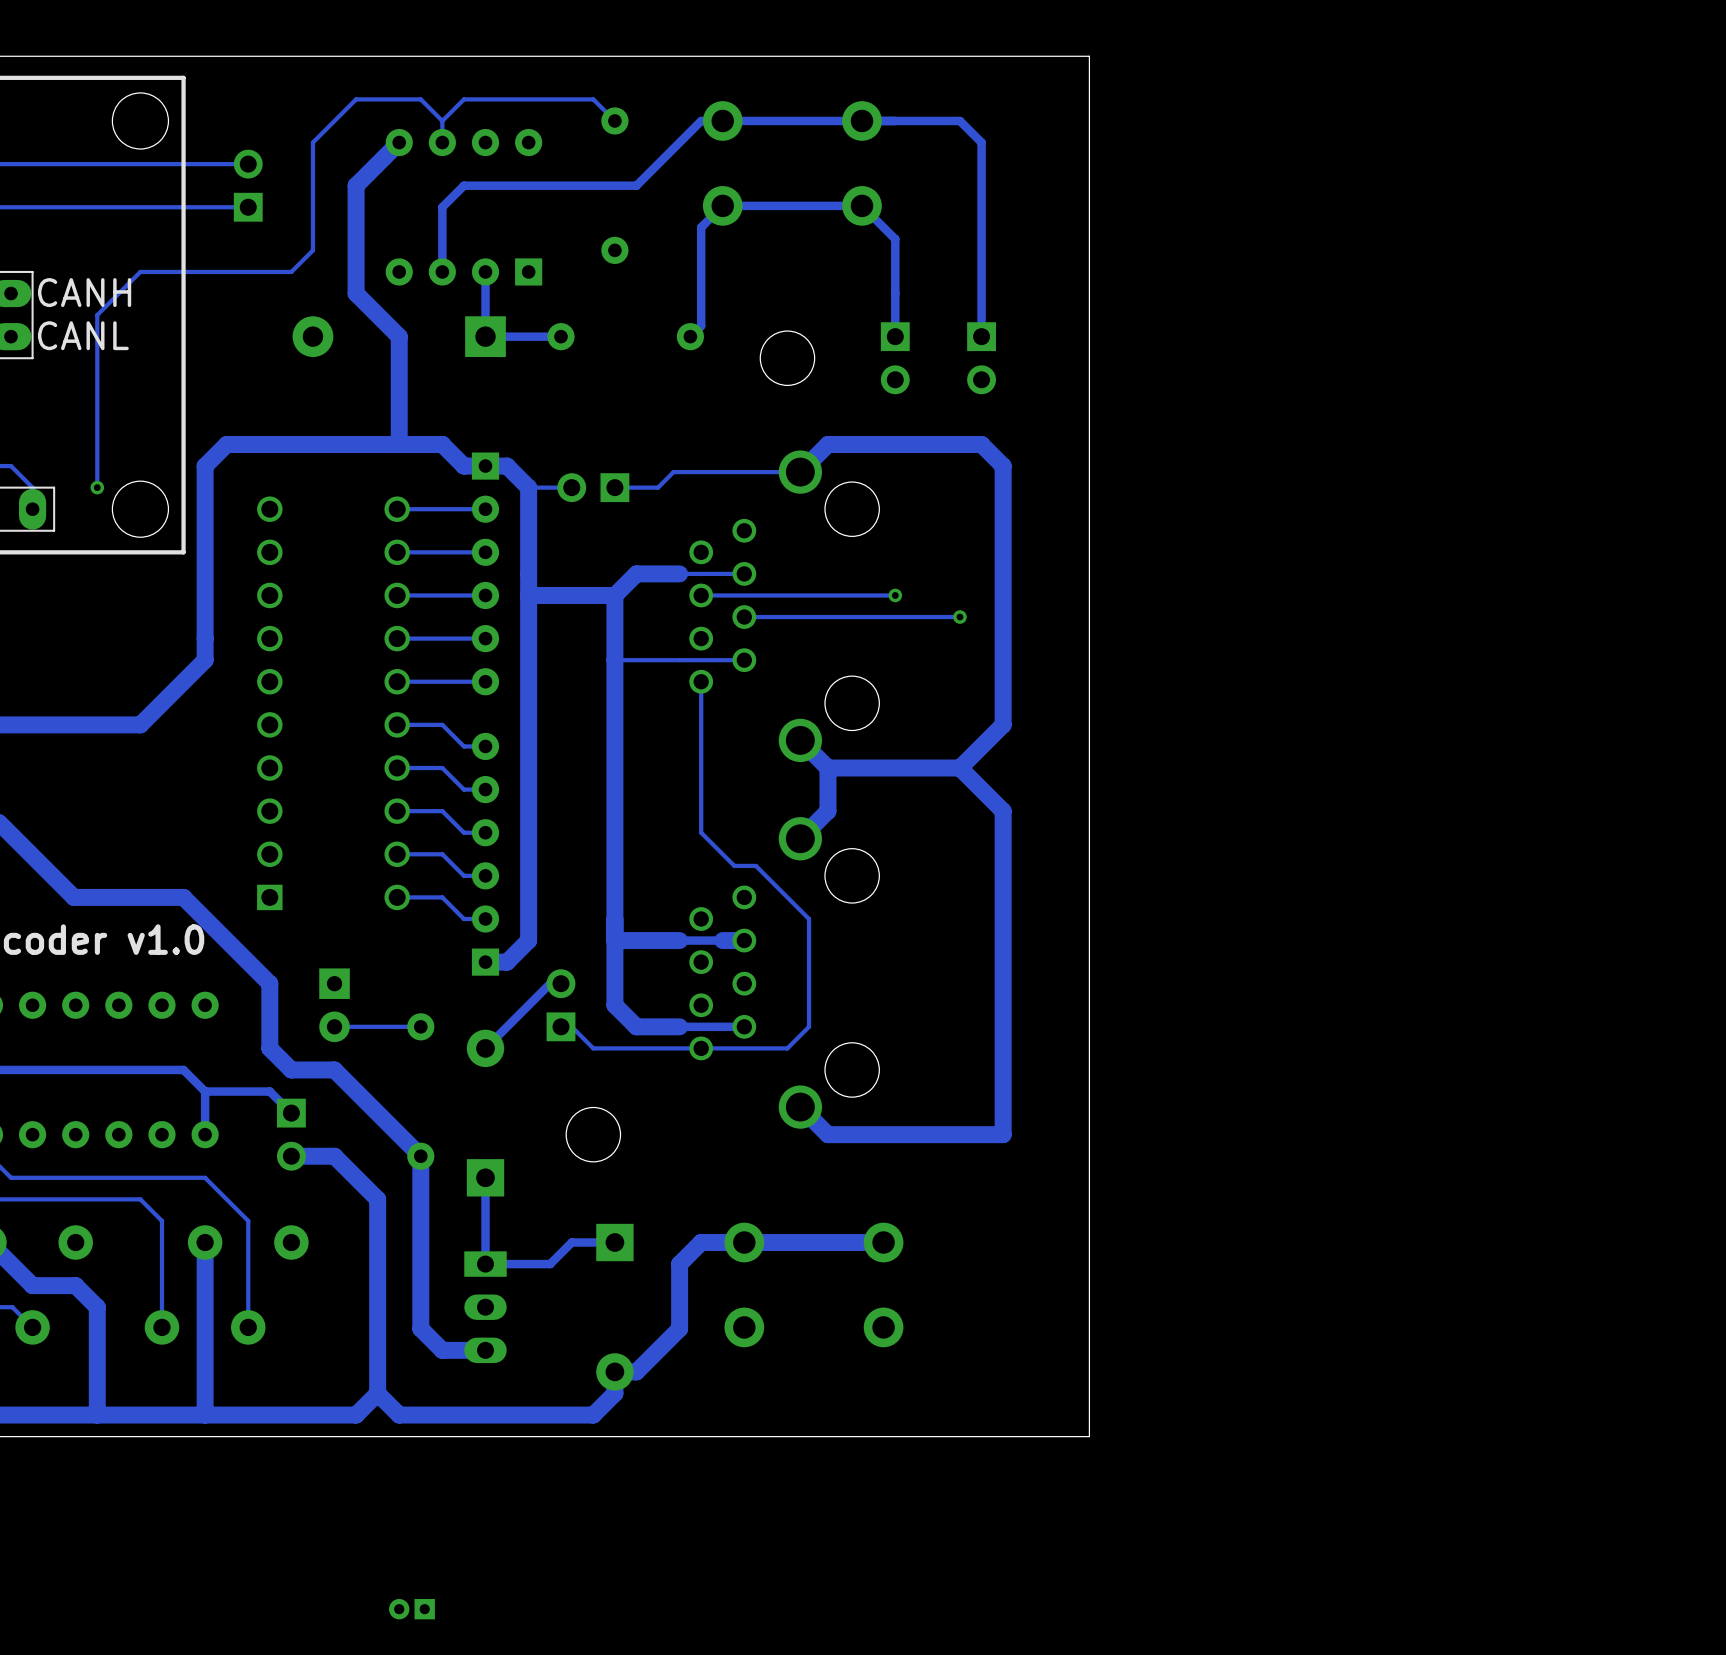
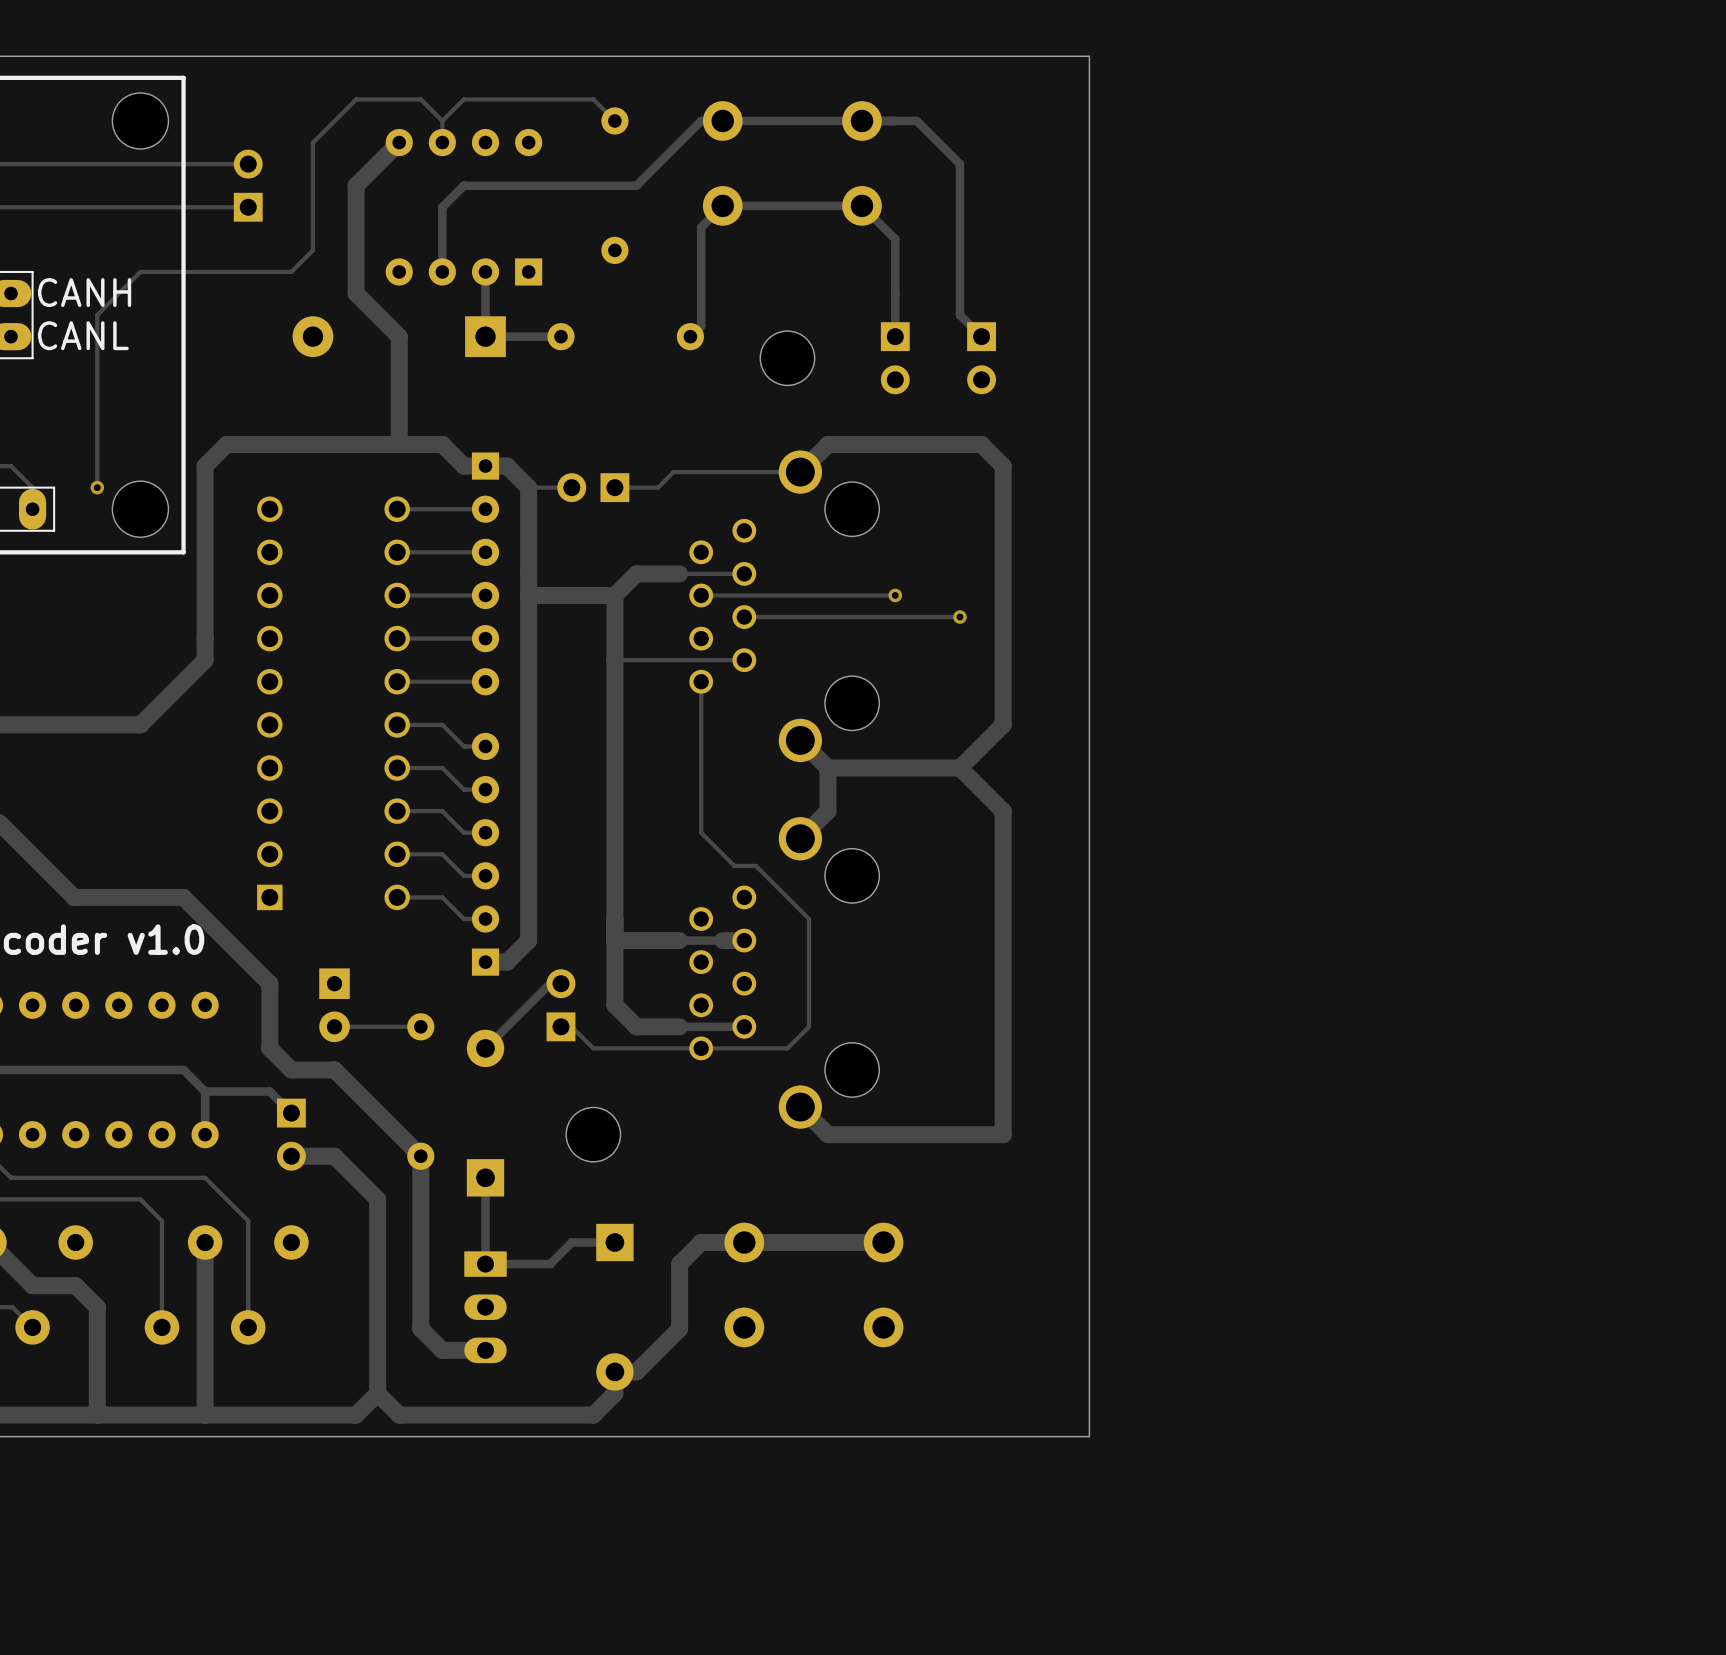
track: (916, 120) (960, 120) (981, 142) (981, 336) -> (916, 120) (960, 164) (960, 315) (981, 336)
part: (411, 1609) -> none

